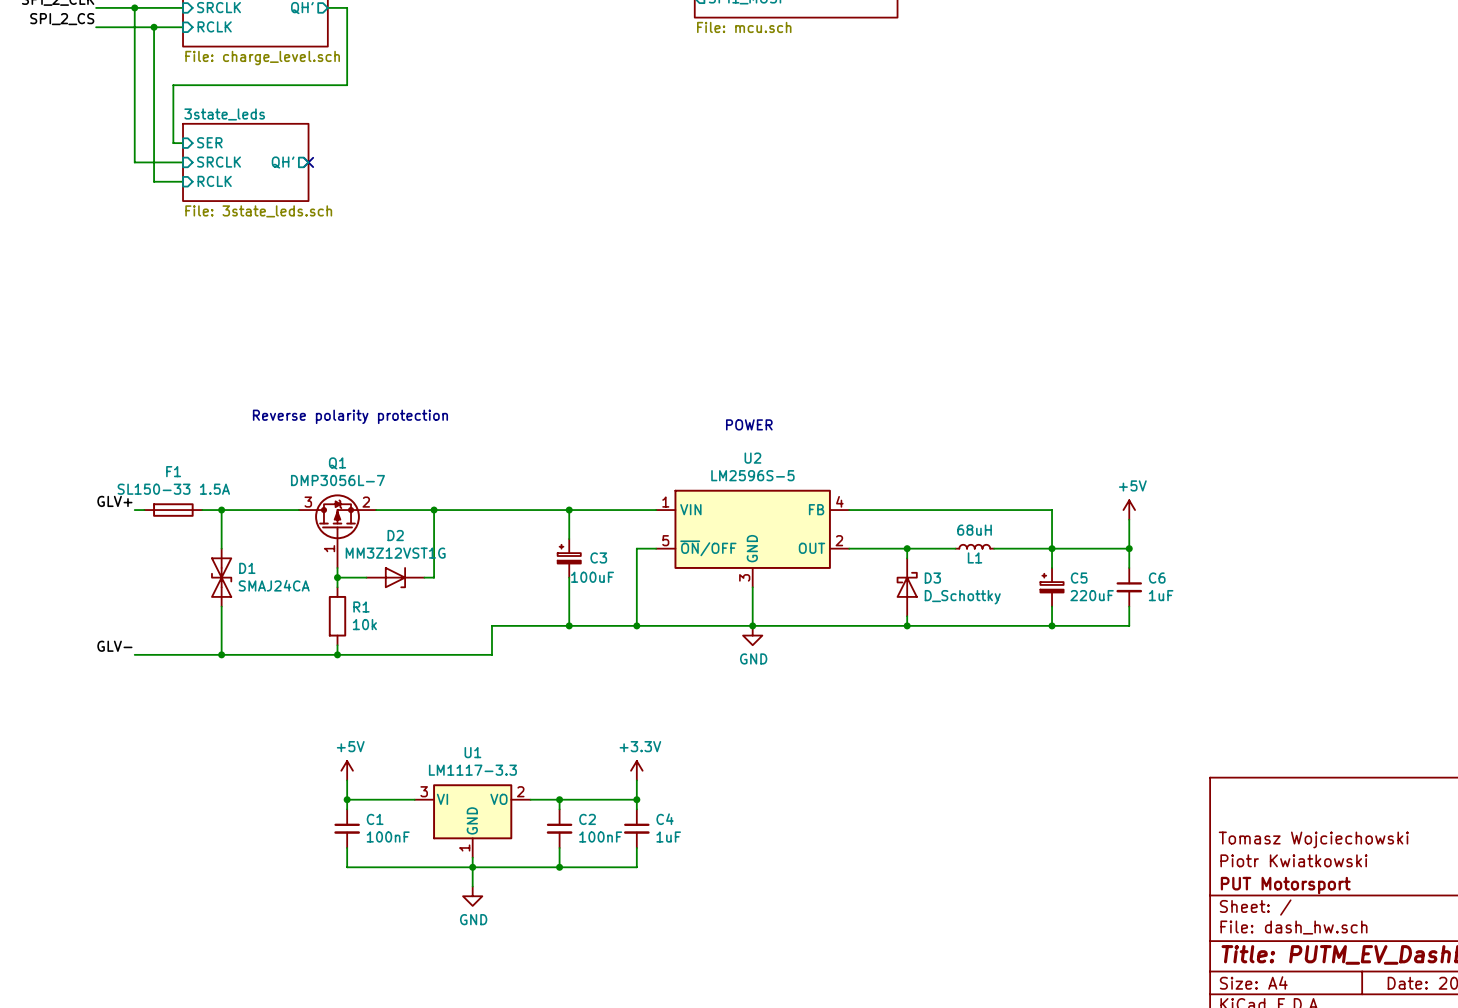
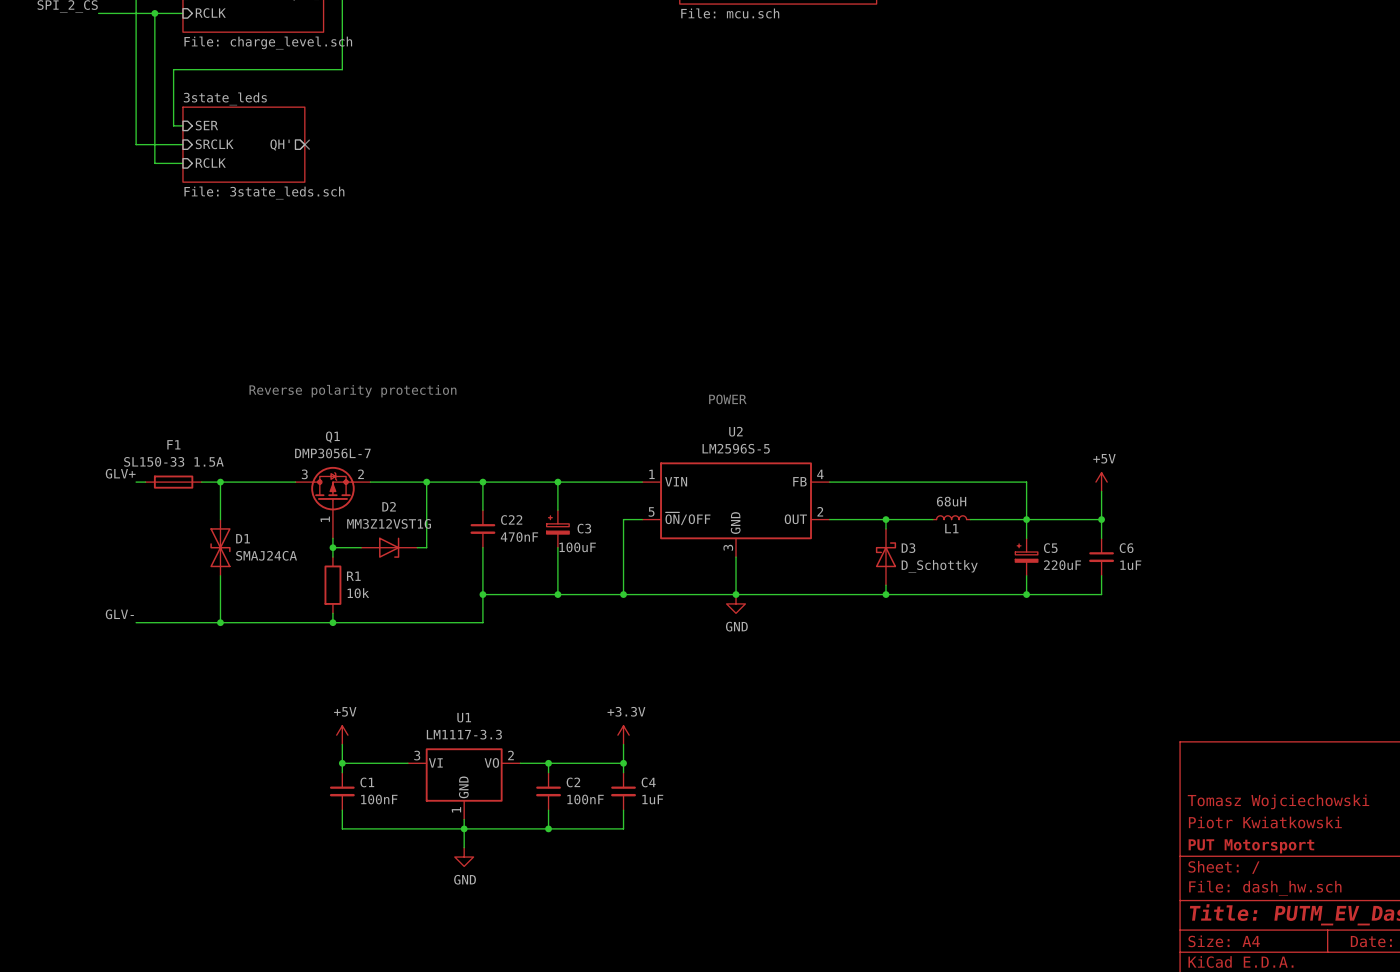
wire: none -> (482, 482) (482, 510)
junction: none -> (482, 482)
C22: none -> 470nF (482, 528)
wire: none -> (482, 547) (482, 594)
junction: none -> (482, 594)

